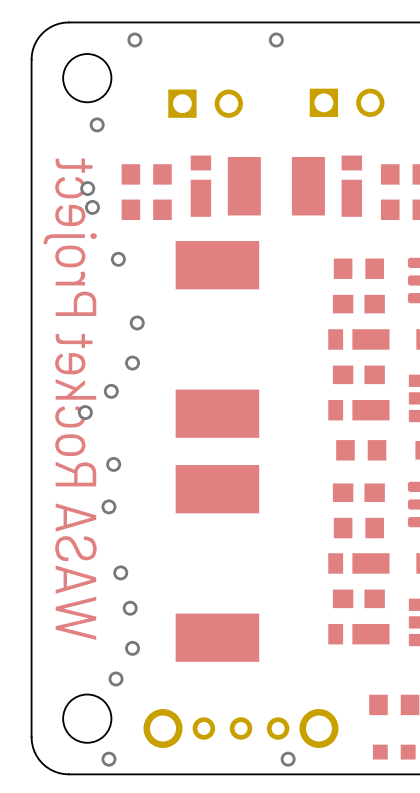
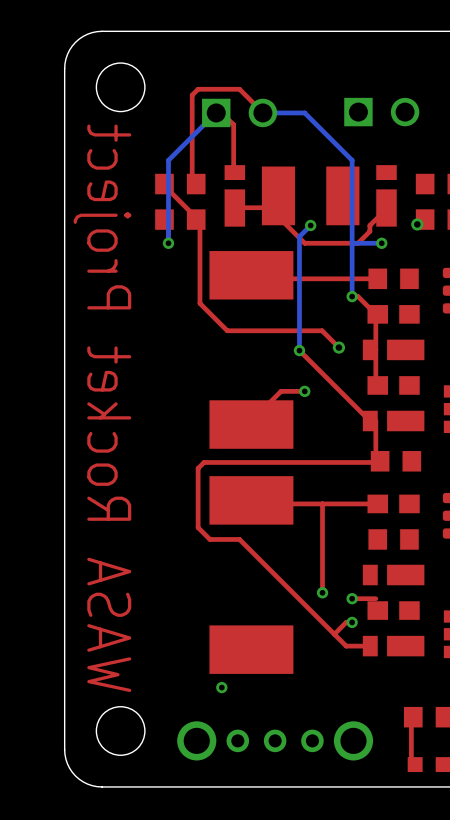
via: (134, 40) -> none
via: (276, 40) -> none
top track: none -> (216, 112) (221, 112) (233, 124) (234, 172)
bottom track: none -> (215, 112) (168, 160) (168, 243)
bottom track: none -> (262, 112) (304, 112) (352, 160) (352, 296)
top track: none -> (263, 112) (239, 89) (198, 89) (192, 95) (192, 180) (196, 180)
via: (97, 124) -> none
top track: none -> (164, 180) (158, 180) (192, 213) (192, 219) (196, 219) (199, 223) (199, 303) (227, 330) (322, 330) (338, 347)
via: (87, 188) -> none
top track: none -> (386, 208) (369, 225) (369, 231) (358, 243) (304, 243) (281, 219) (281, 195) (278, 195) (281, 207) (239, 207) (234, 208)
via: (92, 207) -> none
via: none -> (417, 224)
bottom track: none -> (310, 225) (299, 236) (299, 350)
via: none -> (310, 225)
via: none -> (168, 243)
bottom track: none -> (381, 243) (352, 243)
via: none -> (381, 243)
via: (118, 259) -> none
top track: none -> (251, 275) (251, 278) (375, 278)
top track: none -> (352, 296) (358, 296) (375, 314)
via: none -> (352, 296)
top track: none -> (375, 314) (375, 385) (377, 385)
via: (137, 322) -> none
via: none -> (338, 347)
top track: none -> (299, 350) (369, 420) (375, 420) (375, 456) (380, 461) (204, 462) (198, 468) (198, 527) (209, 539) (239, 539) (346, 646) (370, 646)
via: none -> (299, 350)
via: (132, 363) -> none
top track: none -> (304, 391) (281, 391) (251, 420) (251, 424)
via: none -> (304, 391)
via: (111, 391) -> none
via: (85, 412) -> none
via: (113, 464) -> none
top track: none -> (251, 500) (251, 503) (375, 503)
top track: none -> (322, 503) (322, 592)
via: (108, 506) -> none
via: (120, 572) -> none
via: none -> (322, 592)
via: none -> (352, 598)
top track: none -> (375, 598) (352, 598)
via: (130, 608) -> none
top track: none -> (352, 622) (346, 622) (334, 634)
via: none -> (352, 622)
via: (132, 648) -> none
via: none -> (221, 687)
via: (116, 678) -> none
top track: none -> (413, 717) (411, 717) (411, 764) (415, 764)
via: (108, 759) -> none
via: (288, 759) -> none

